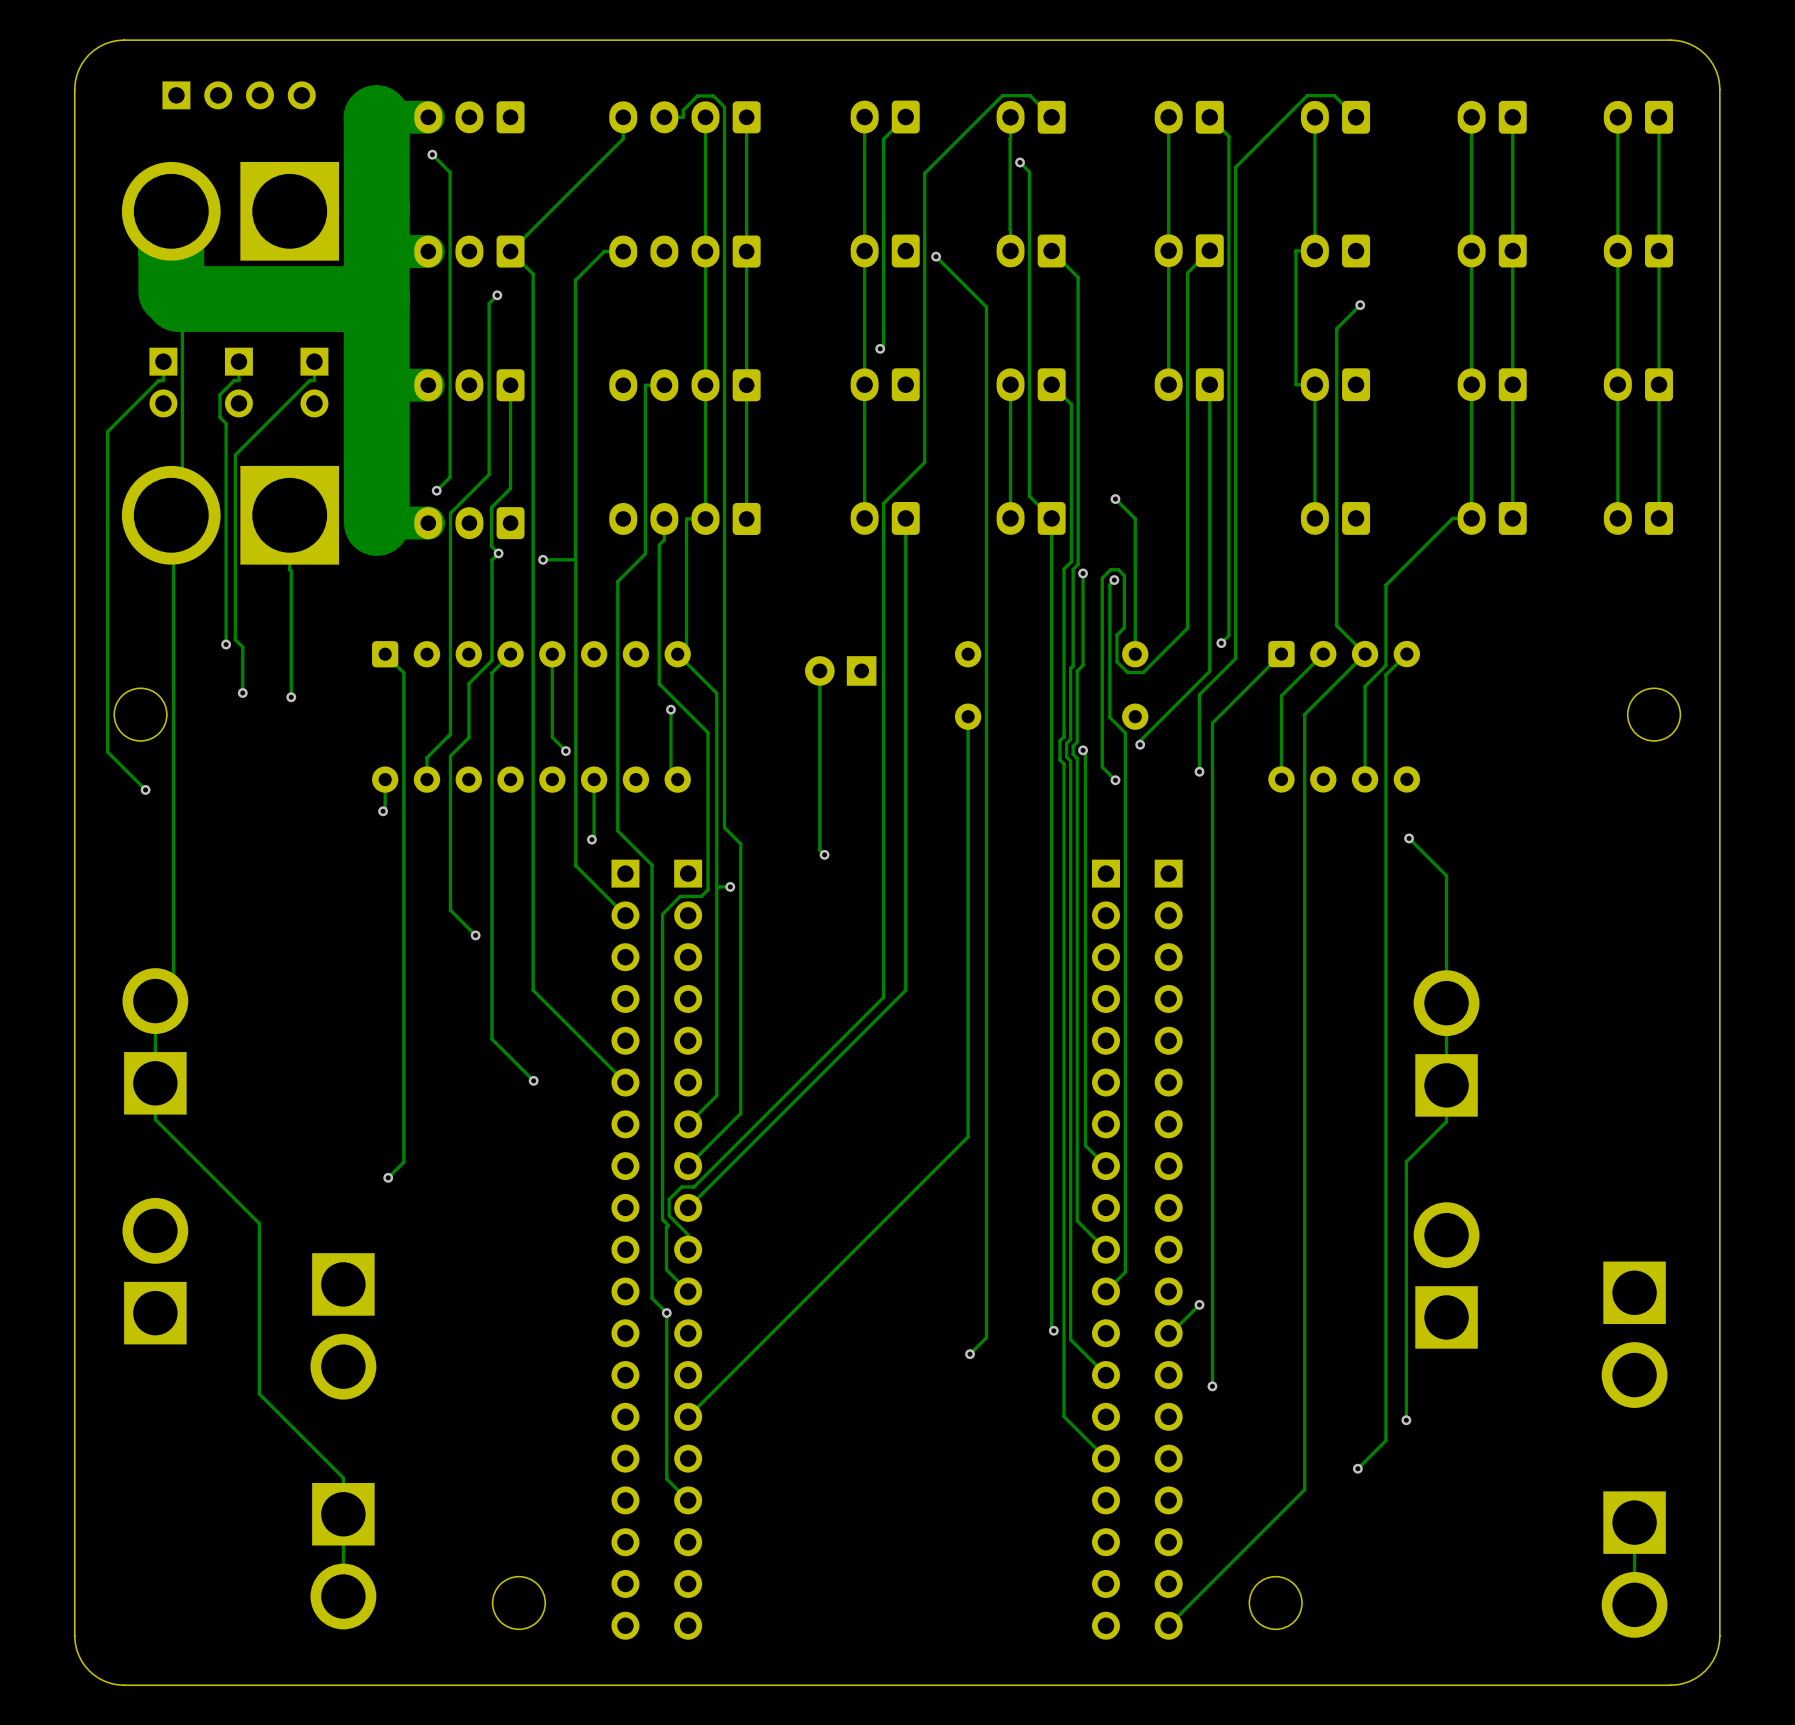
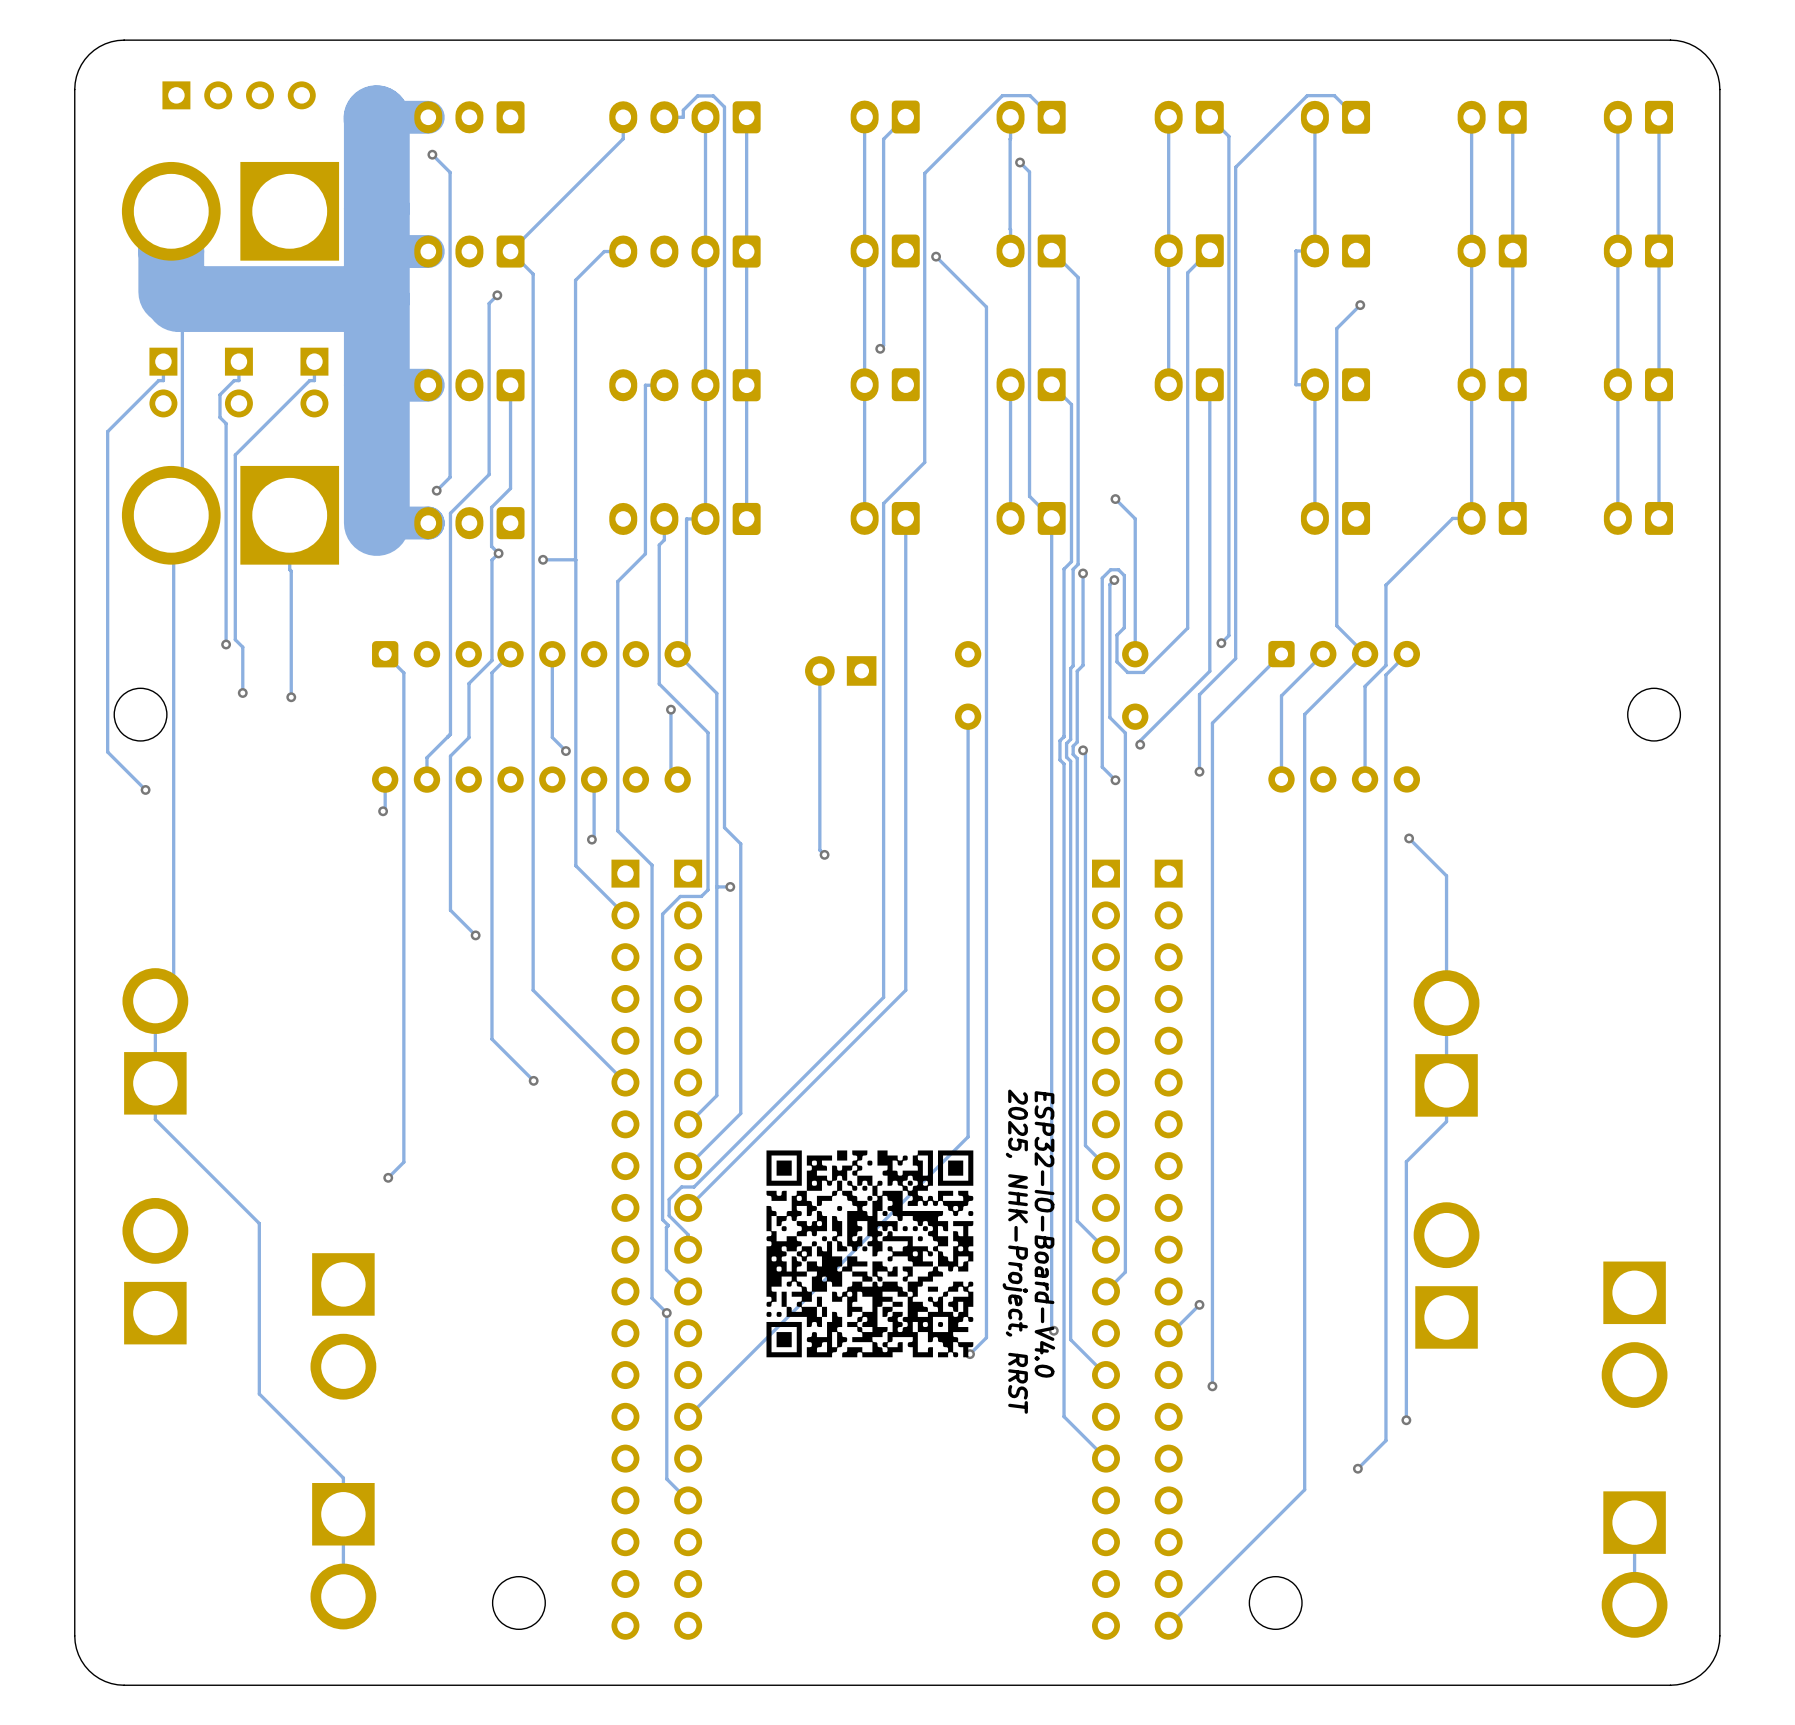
drawing: none -> [766, 1150, 974, 1358]
text: none -> ESP32-IO-Board-V4.0 (1044, 1234)
text: none -> 2025, NHK-Project, RRST (1015, 1251)

